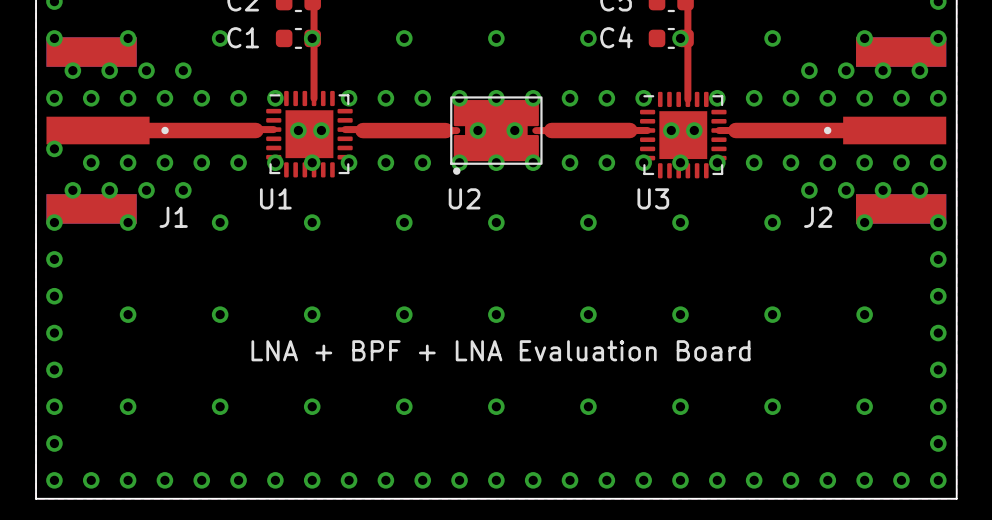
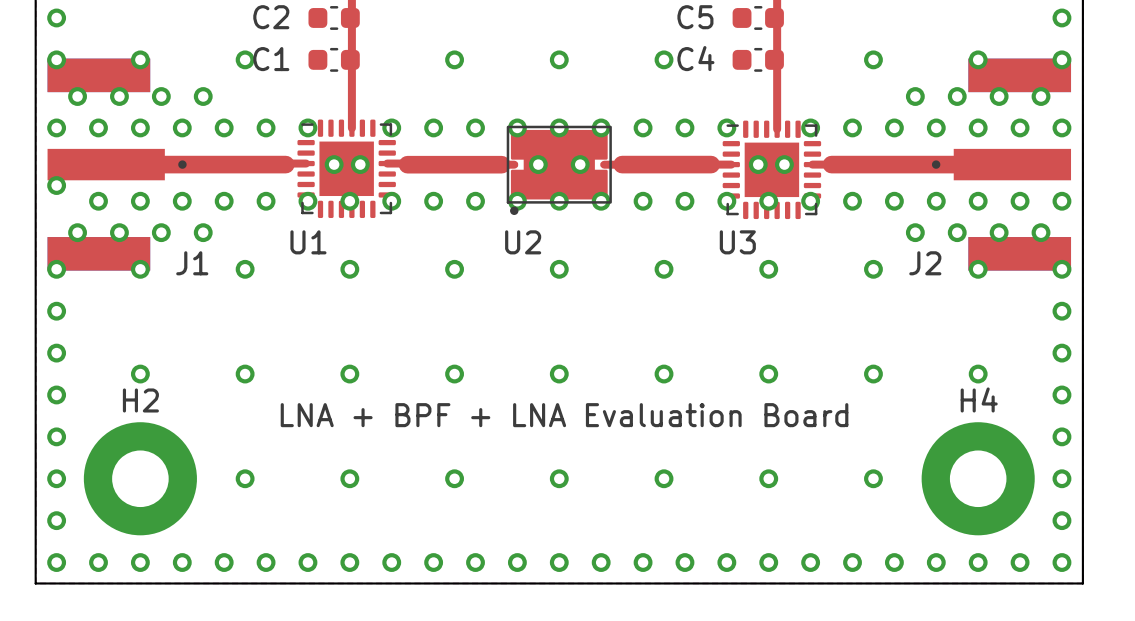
via: (312, 38) -> none
via: (680, 38) -> none
via: (128, 406) -> none
H2: none -> (140, 478)
via: (864, 406) -> none
H4: none -> (978, 478)

